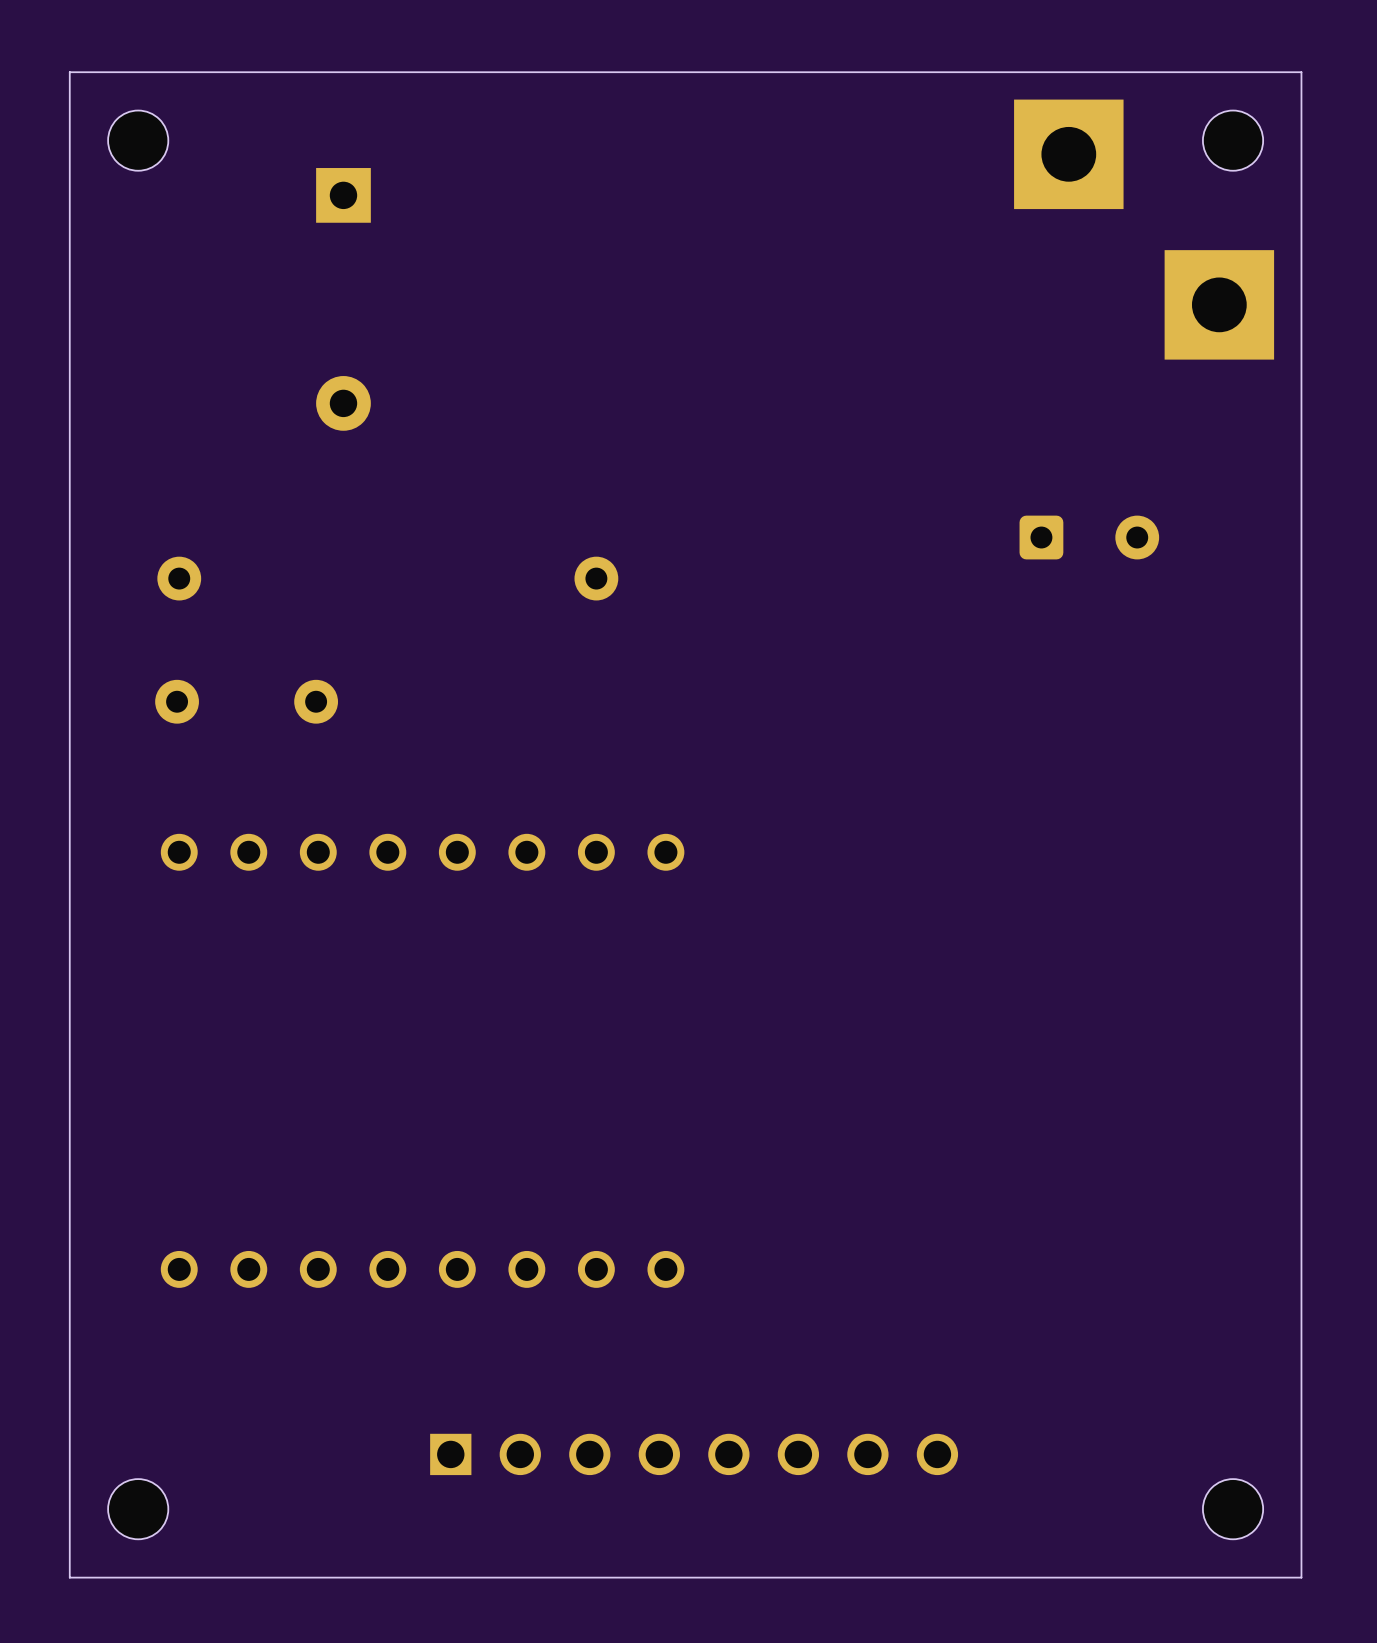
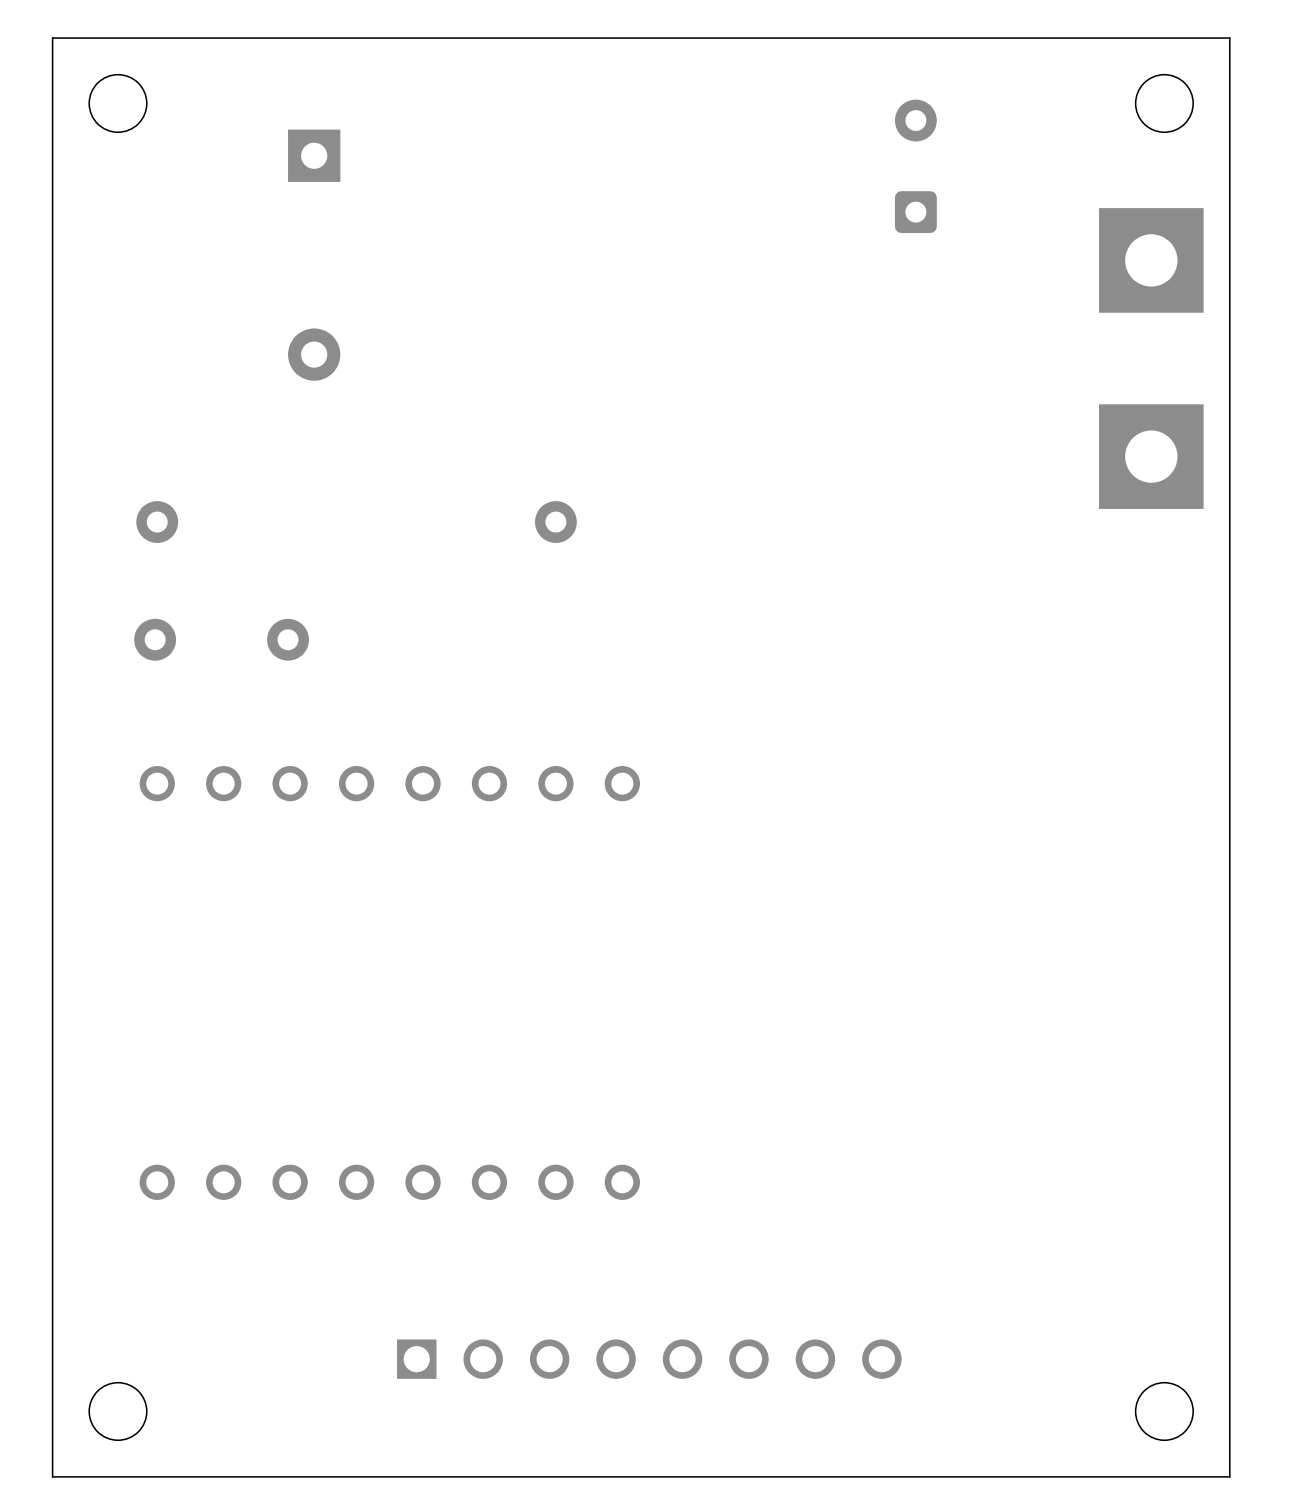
part position: (1068, 154) -> (1151, 456)
part rotation: 0° (1089, 537) -> 90° counterclockwise (915, 166)
part position: (1089, 537) -> (915, 166)

